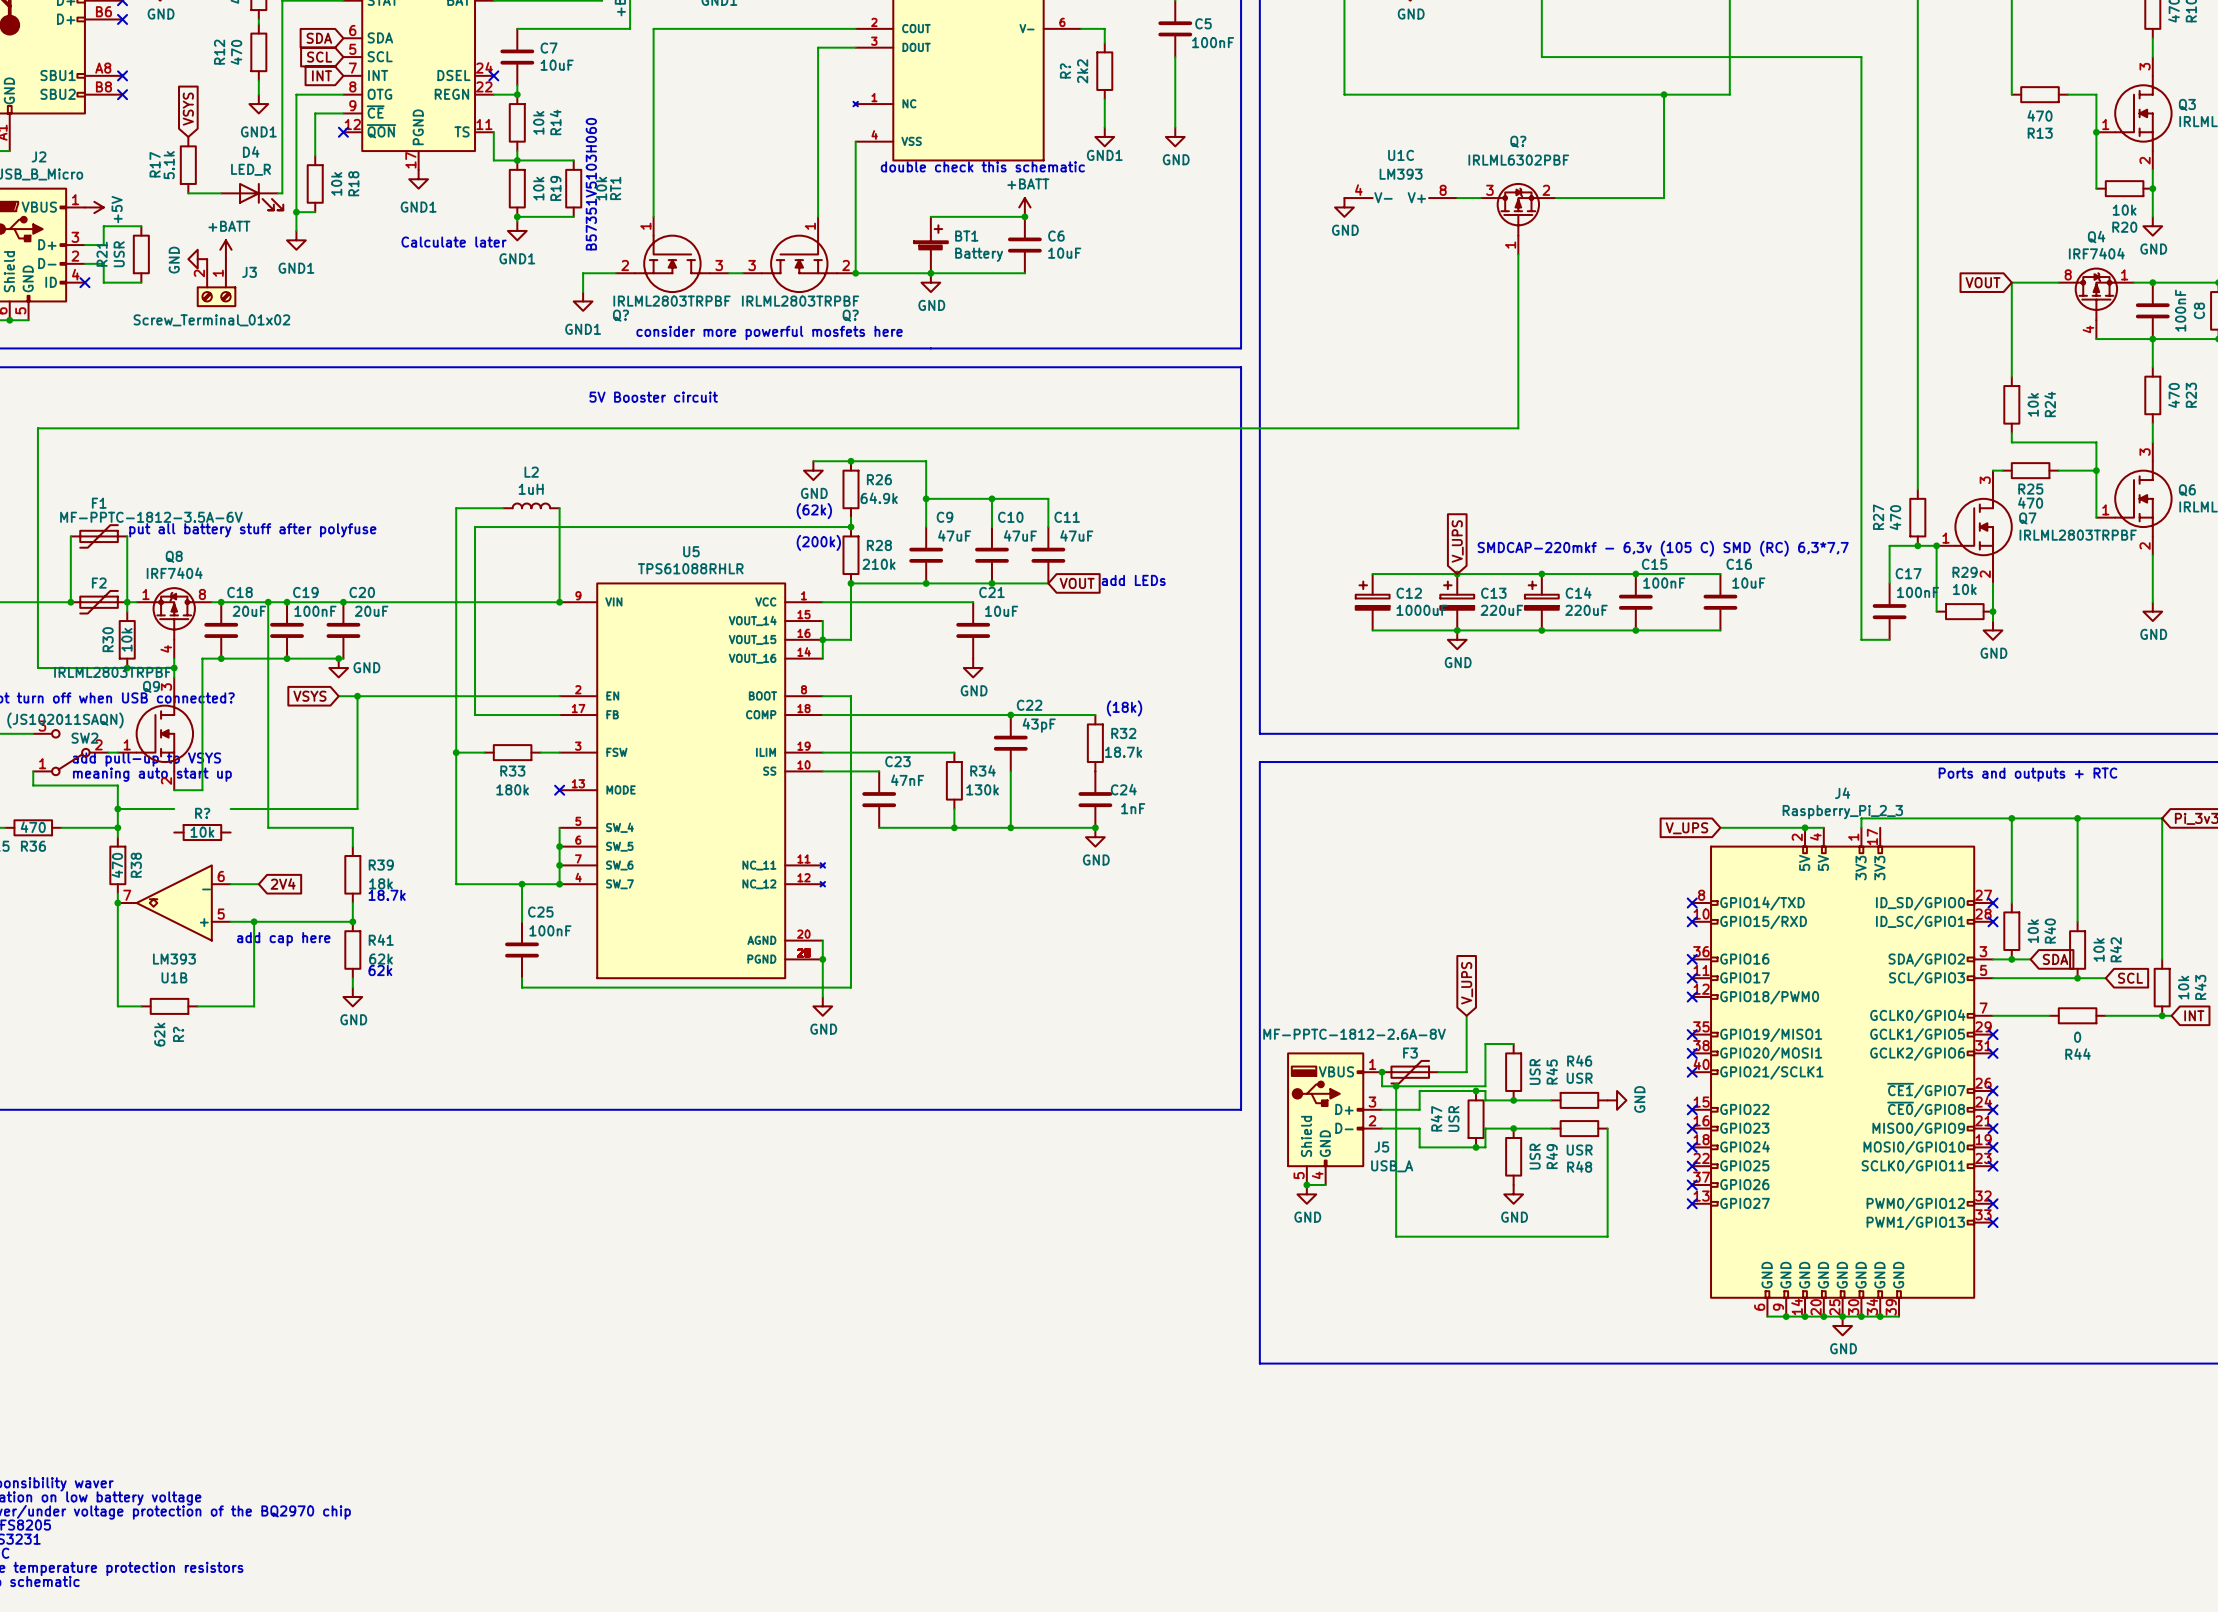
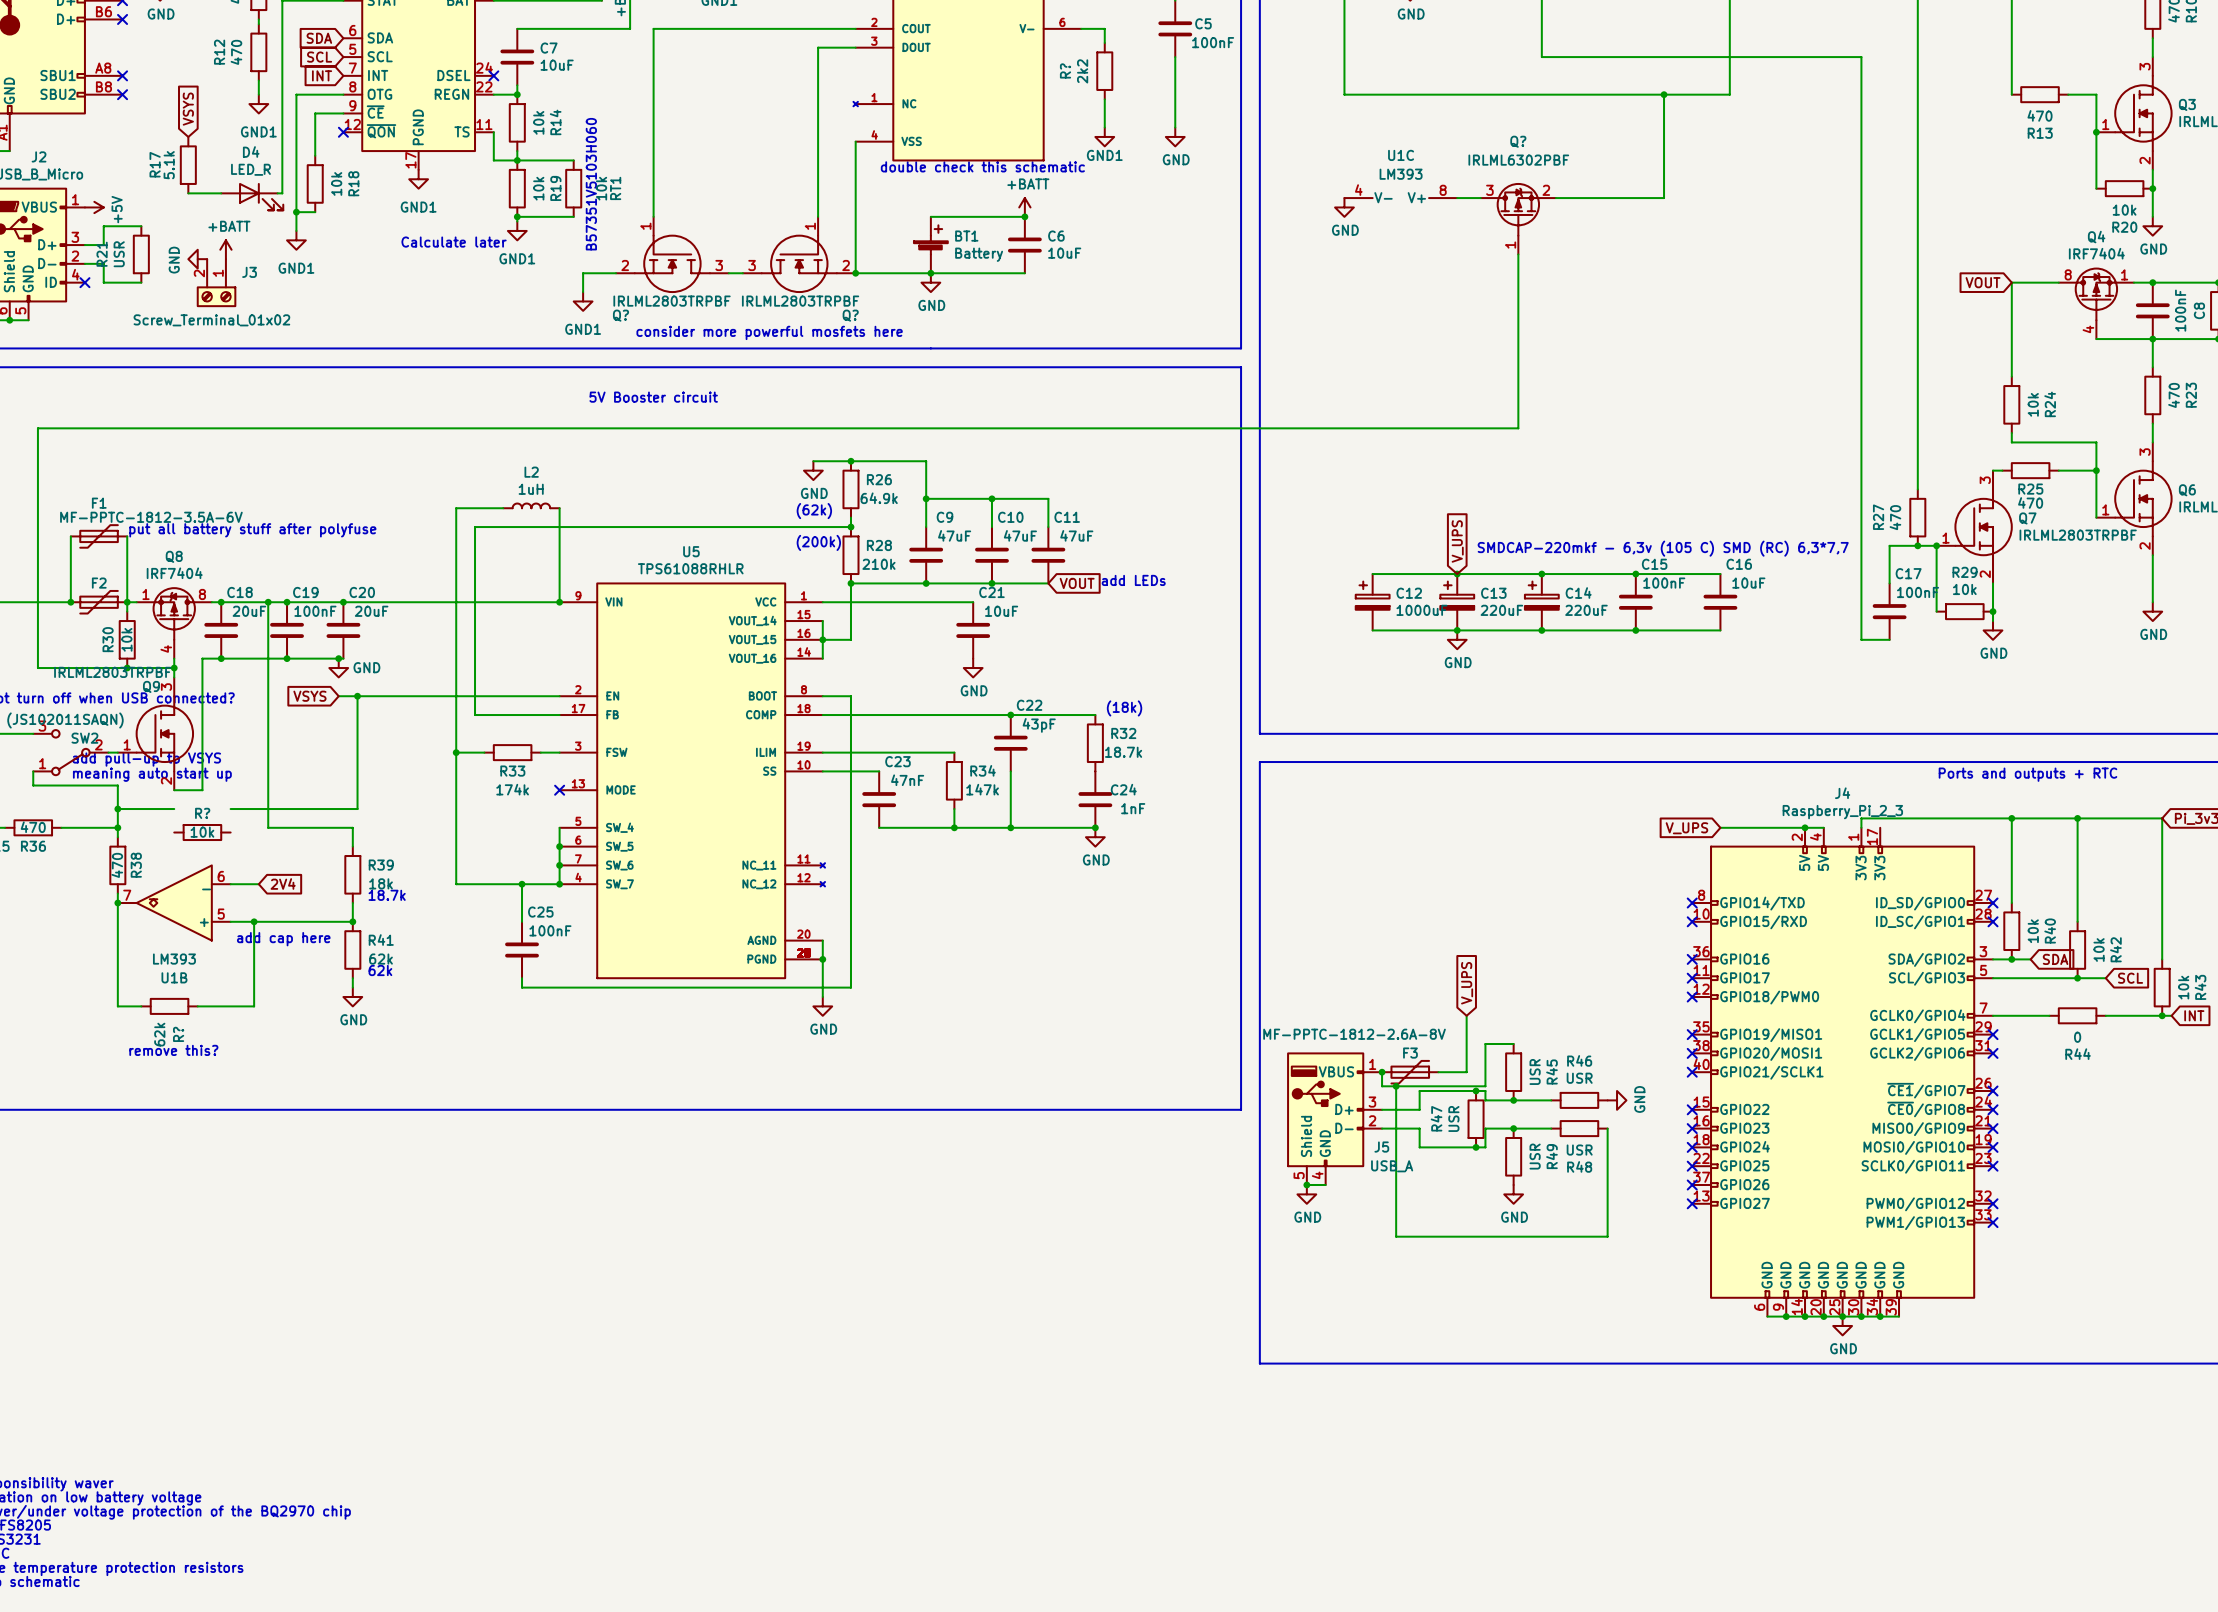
R33 value: 180k (512, 789) -> 174k (512, 789)
R34 value: 130k (982, 789) -> 147k (982, 789)
text: none -> remove this? (173, 1050)

